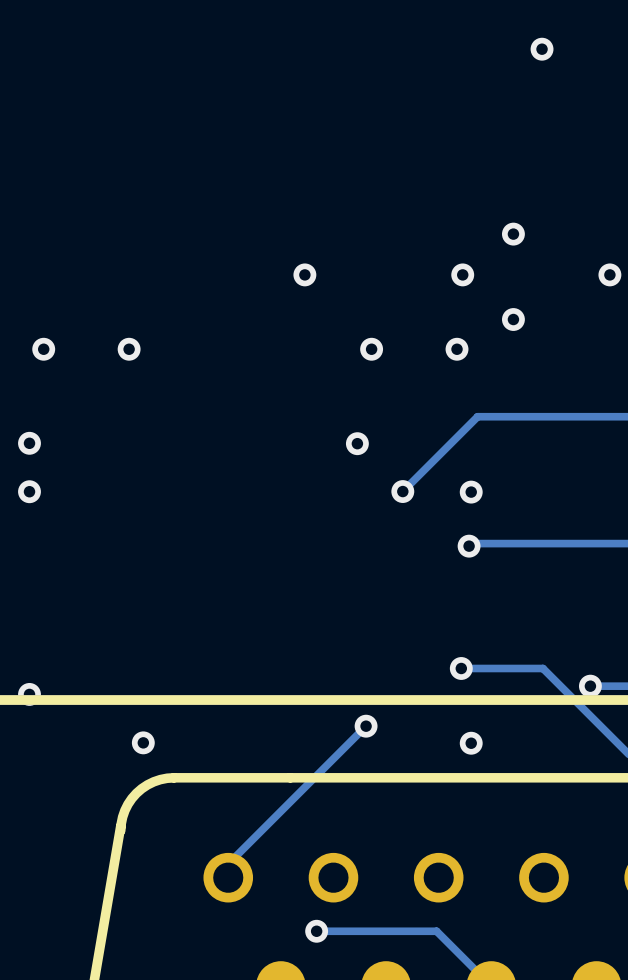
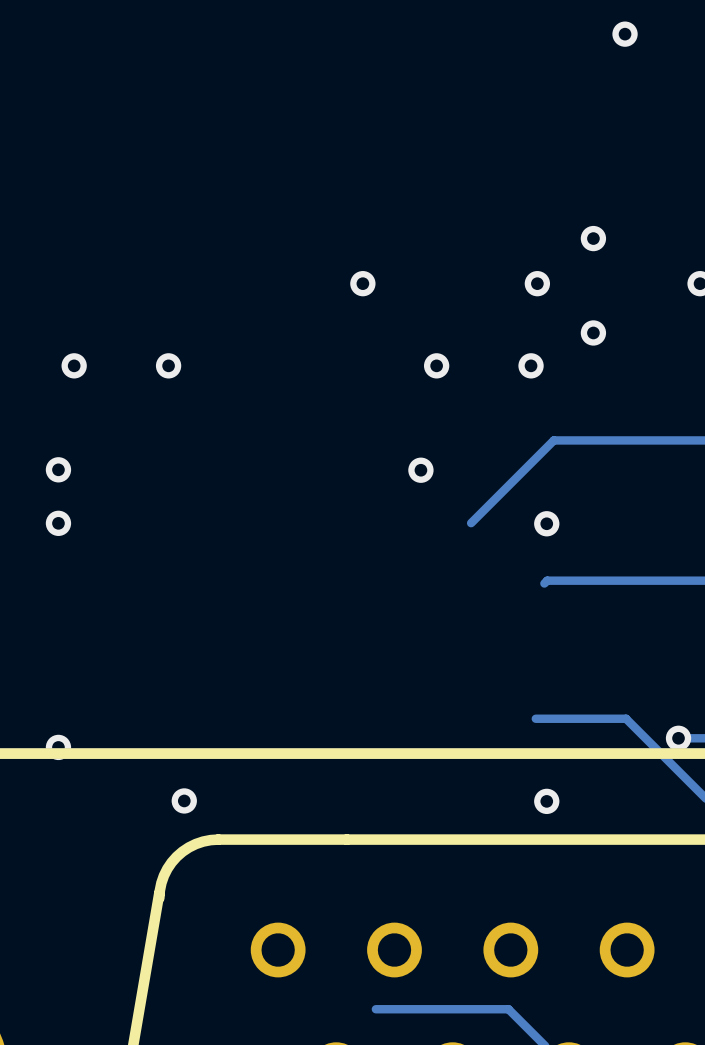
via: (402, 491) -> none
via: (469, 546) -> none
via: (461, 668) -> none
track: (366, 726) (228, 864) (228, 877) -> none
via: (366, 726) -> none
via: (316, 931) -> none

